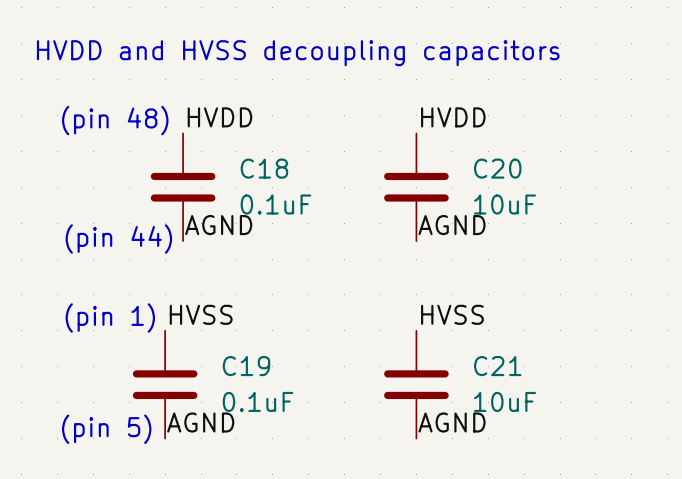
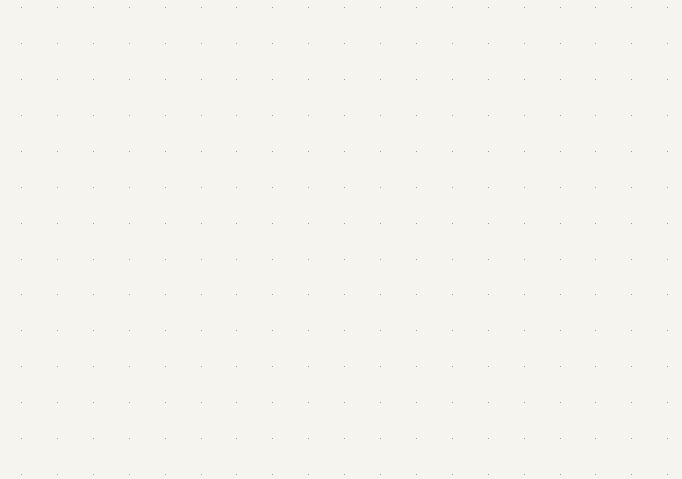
text: HVDD and HVSS decoupling capacitors (298, 53) -> none
label: HVDD (219, 117) -> none
label: HVDD (453, 117) -> none
text: (pin 48) (115, 120) -> none
C18: 0.1uF (183, 187) -> none
C20: 10uF (416, 187) -> none
label: AGND (218, 225) -> none
label: AGND (452, 225) -> none
text: (pin 44) (118, 239) -> none
label: HVSS (201, 314) -> none
label: HVSS (452, 314) -> none
text: (pin 1) (110, 317) -> none
C19: 0.1uF (165, 384) -> none
C21: 10uF (416, 384) -> none
label: AGND (200, 422) -> none
label: AGND (452, 422) -> none
text: (pin 5) (106, 429) -> none

